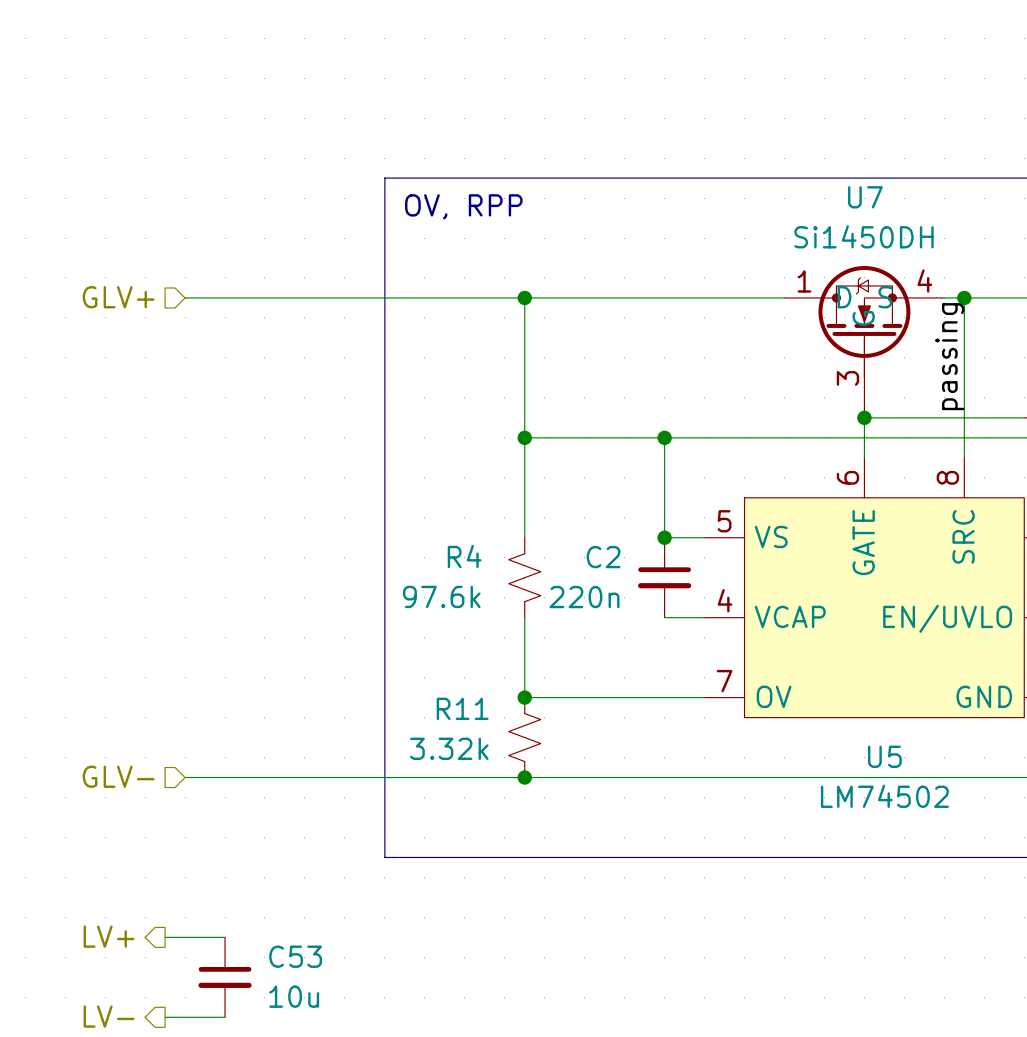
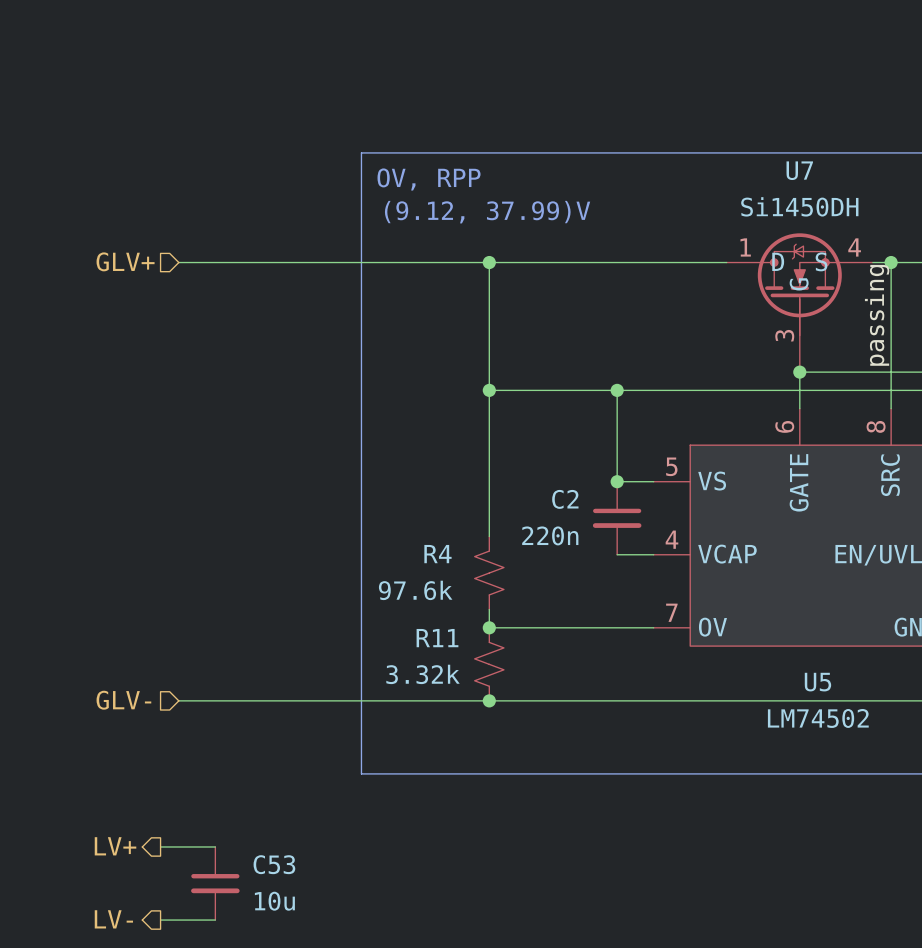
text: none -> (9.12, 37.99)V (487, 212)
R4 position: (524, 577) -> (489, 573)
wire: (524, 617) (524, 677) -> (489, 481) (489, 536)

